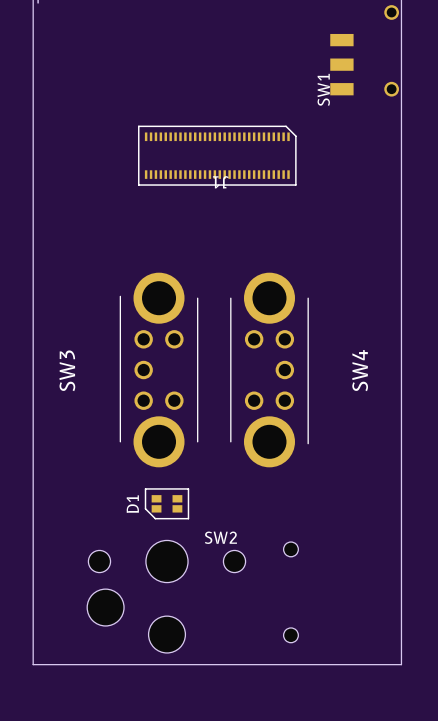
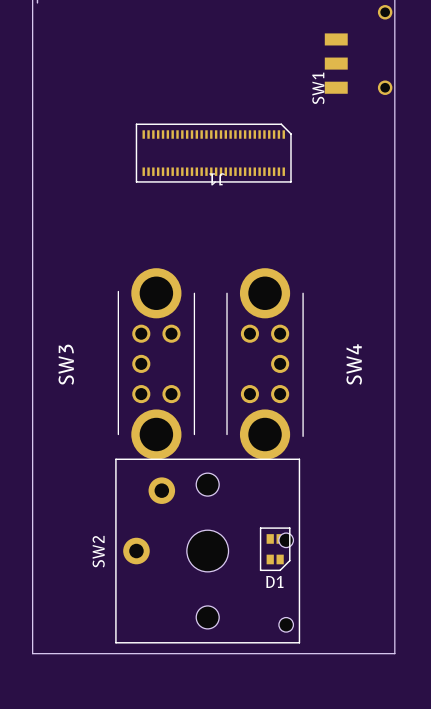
D1 rotation: 0° (166, 503) -> 90° counterclockwise (275, 549)
D1 position: (166, 503) -> (275, 549)
SW2 name position: SW2 (220, 537) -> SW2 (98, 551)
SW2 footprint: [87, 540, 246, 653] -> [115, 458, 301, 644]

